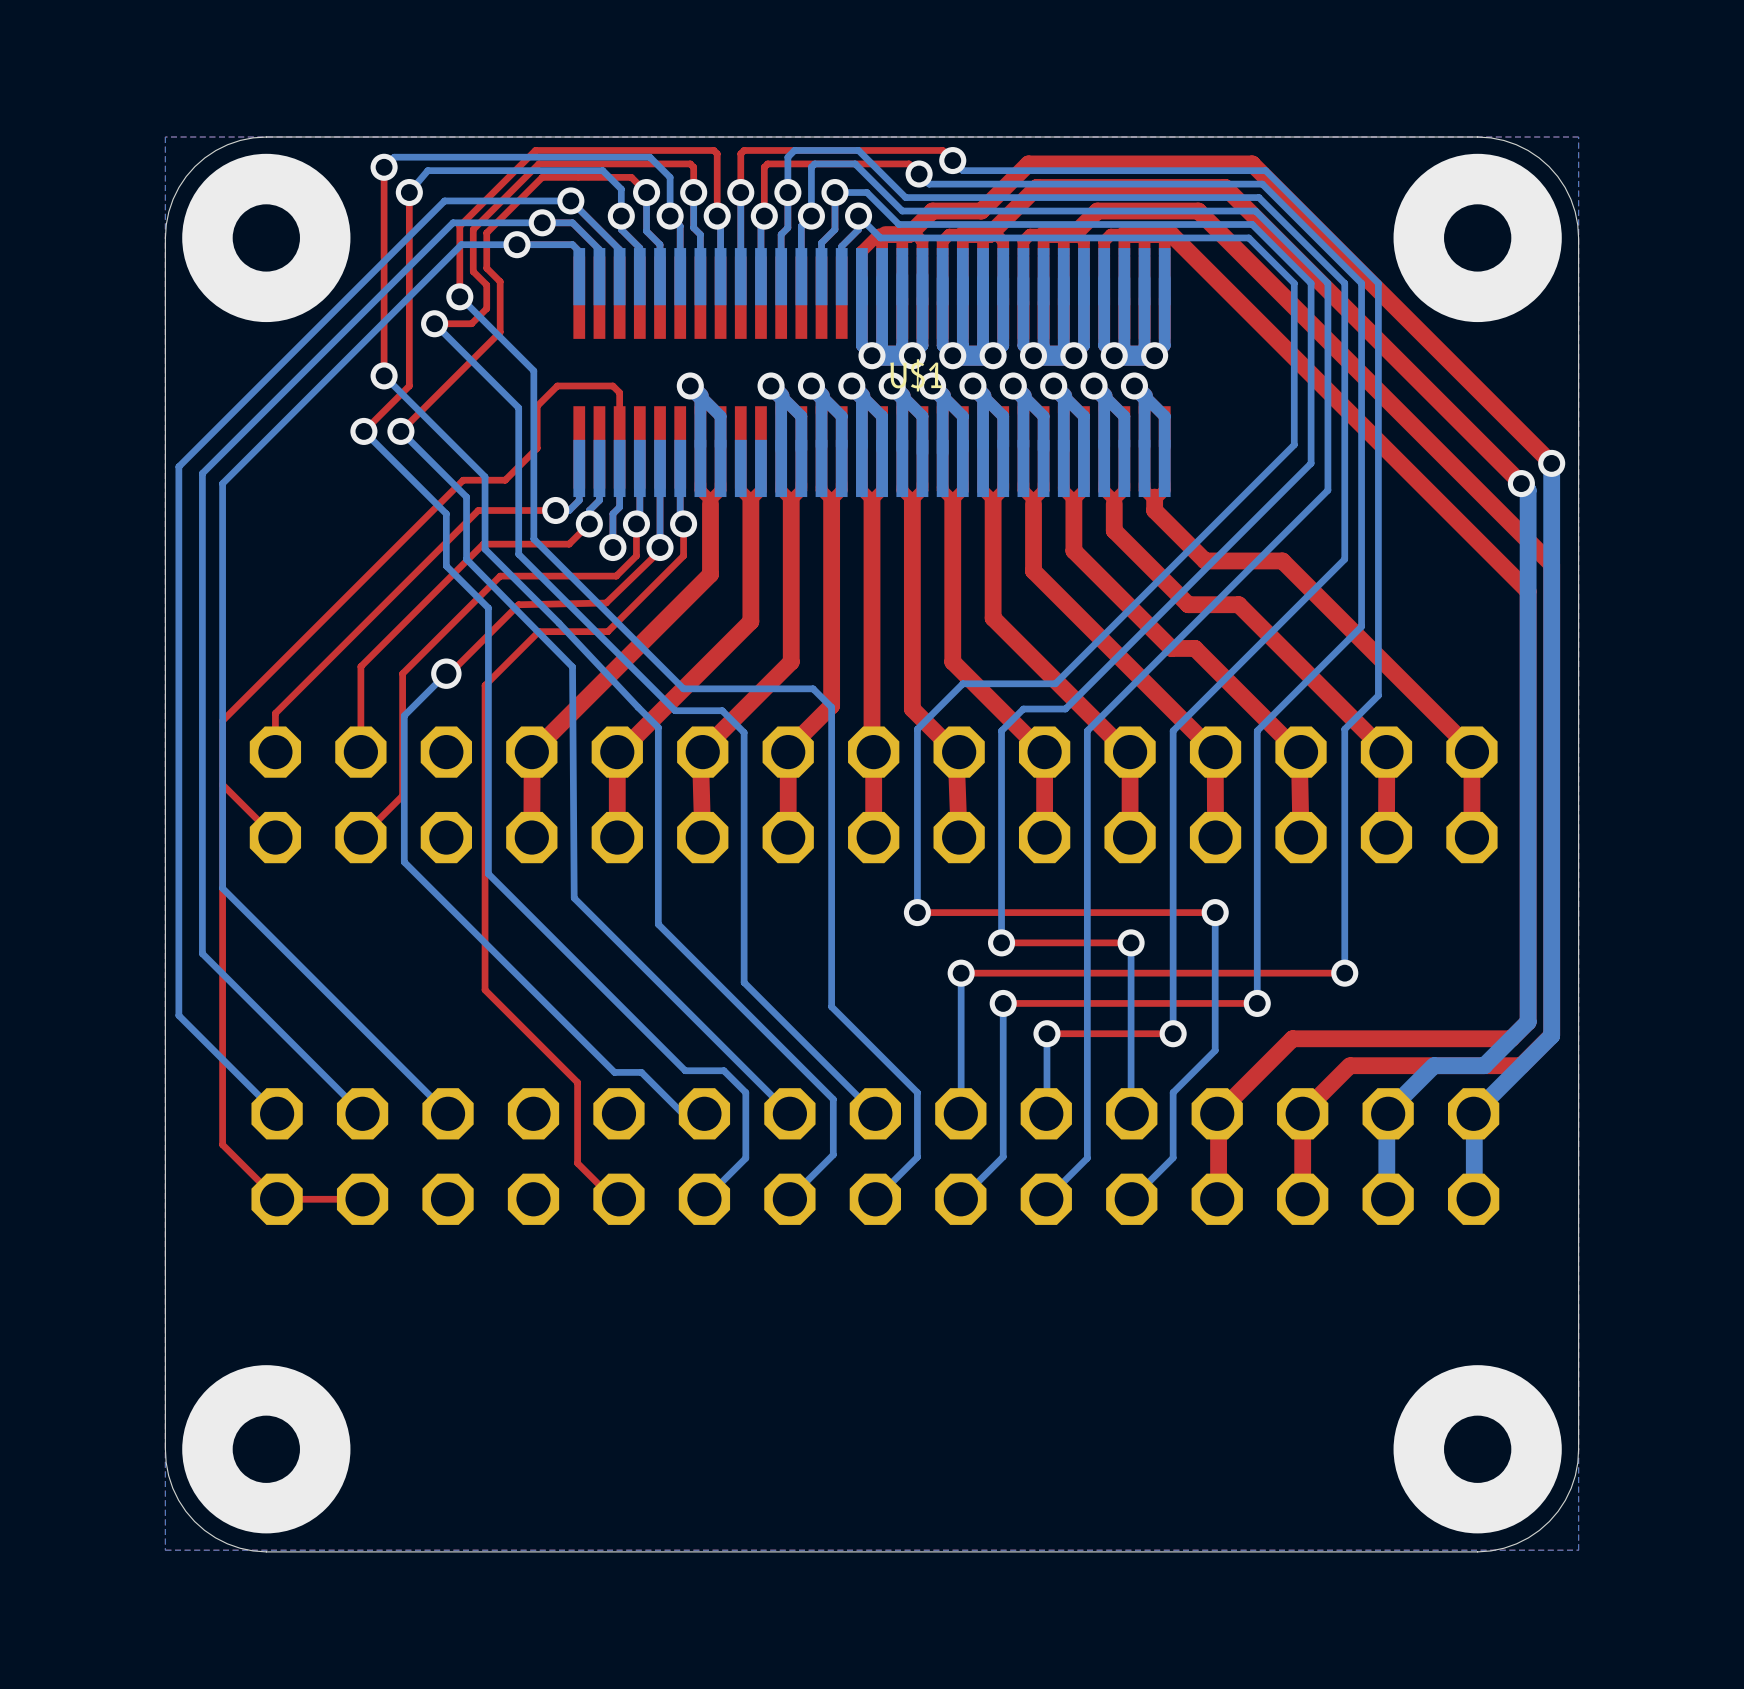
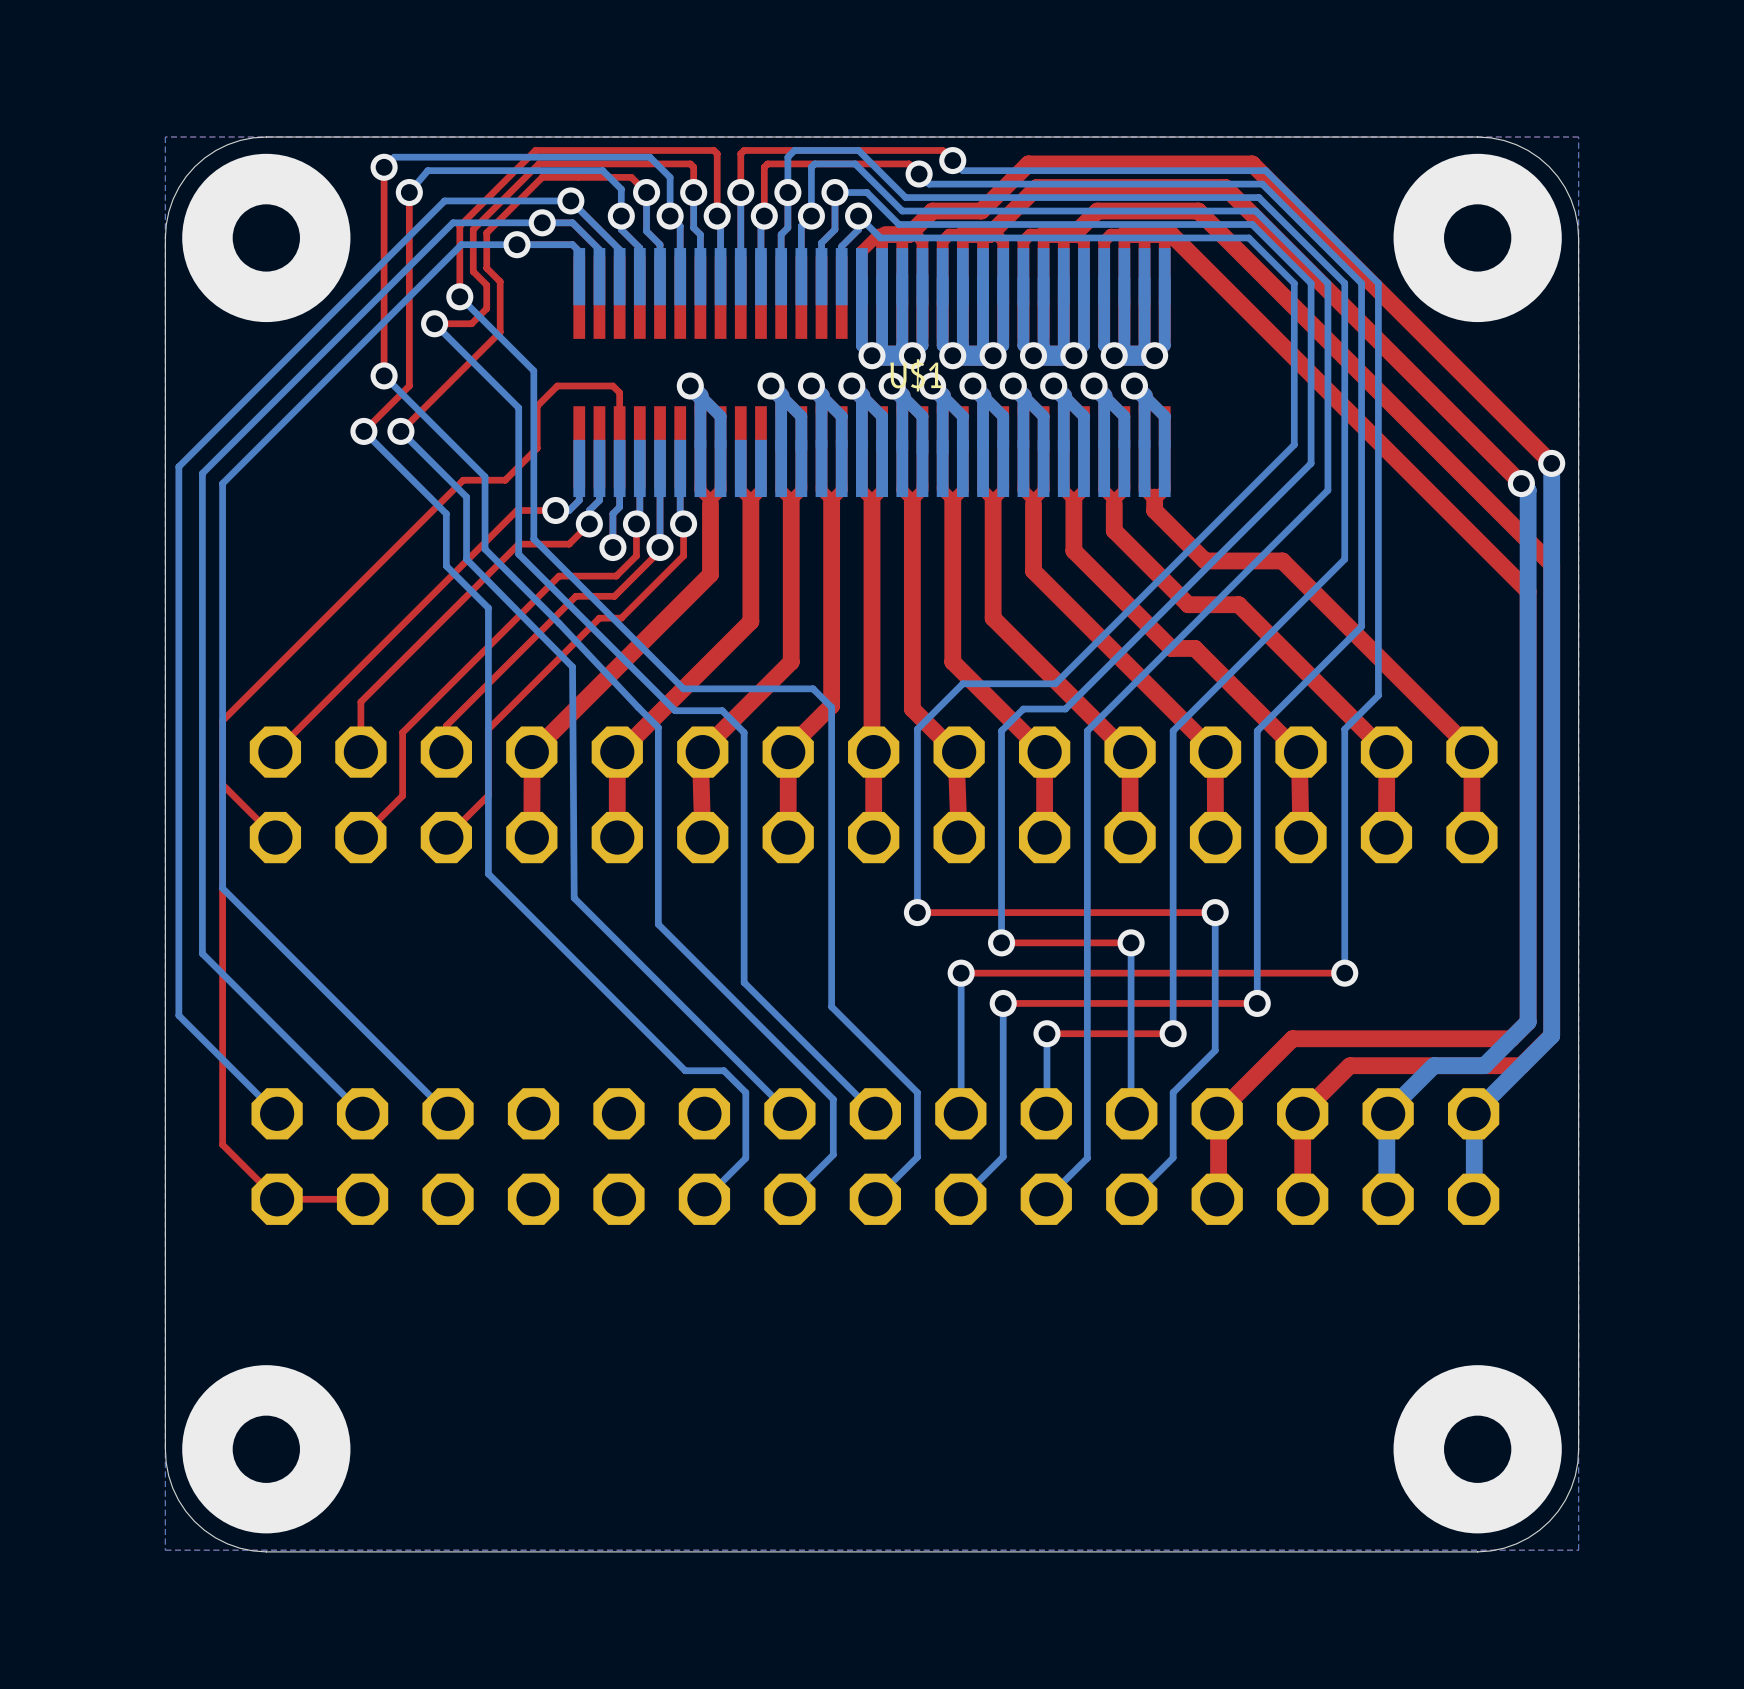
top track: (517, 510) (478, 510) (275, 713) (275, 752) -> none
top track: (518, 544) (483, 544) -> (517, 510) (483, 544)
top track: none -> (518, 544) (360, 701)
top track: (660, 550) (606, 603) (518, 604) (449, 673) (446, 673) -> (660, 550) (614, 596) (575, 596) (446, 725) (446, 752)
top track: (559, 576) (500, 576) (402, 673) (402, 732) -> (559, 576) (402, 732)
top track: (621, 618) (607, 631) (538, 631) (485, 685) (485, 989) (577, 1082) (577, 1163) (613, 1199) (618, 1199) -> (621, 618) (599, 618) (488, 729) (488, 795) (446, 837)
top track: (360, 666) (360, 701) -> (360, 666) (275, 752)
bottom track: (446, 673) (404, 715) (404, 862) (614, 1072) (641, 1072) (682, 1113) (704, 1113) -> none
via: (446, 673) -> none

